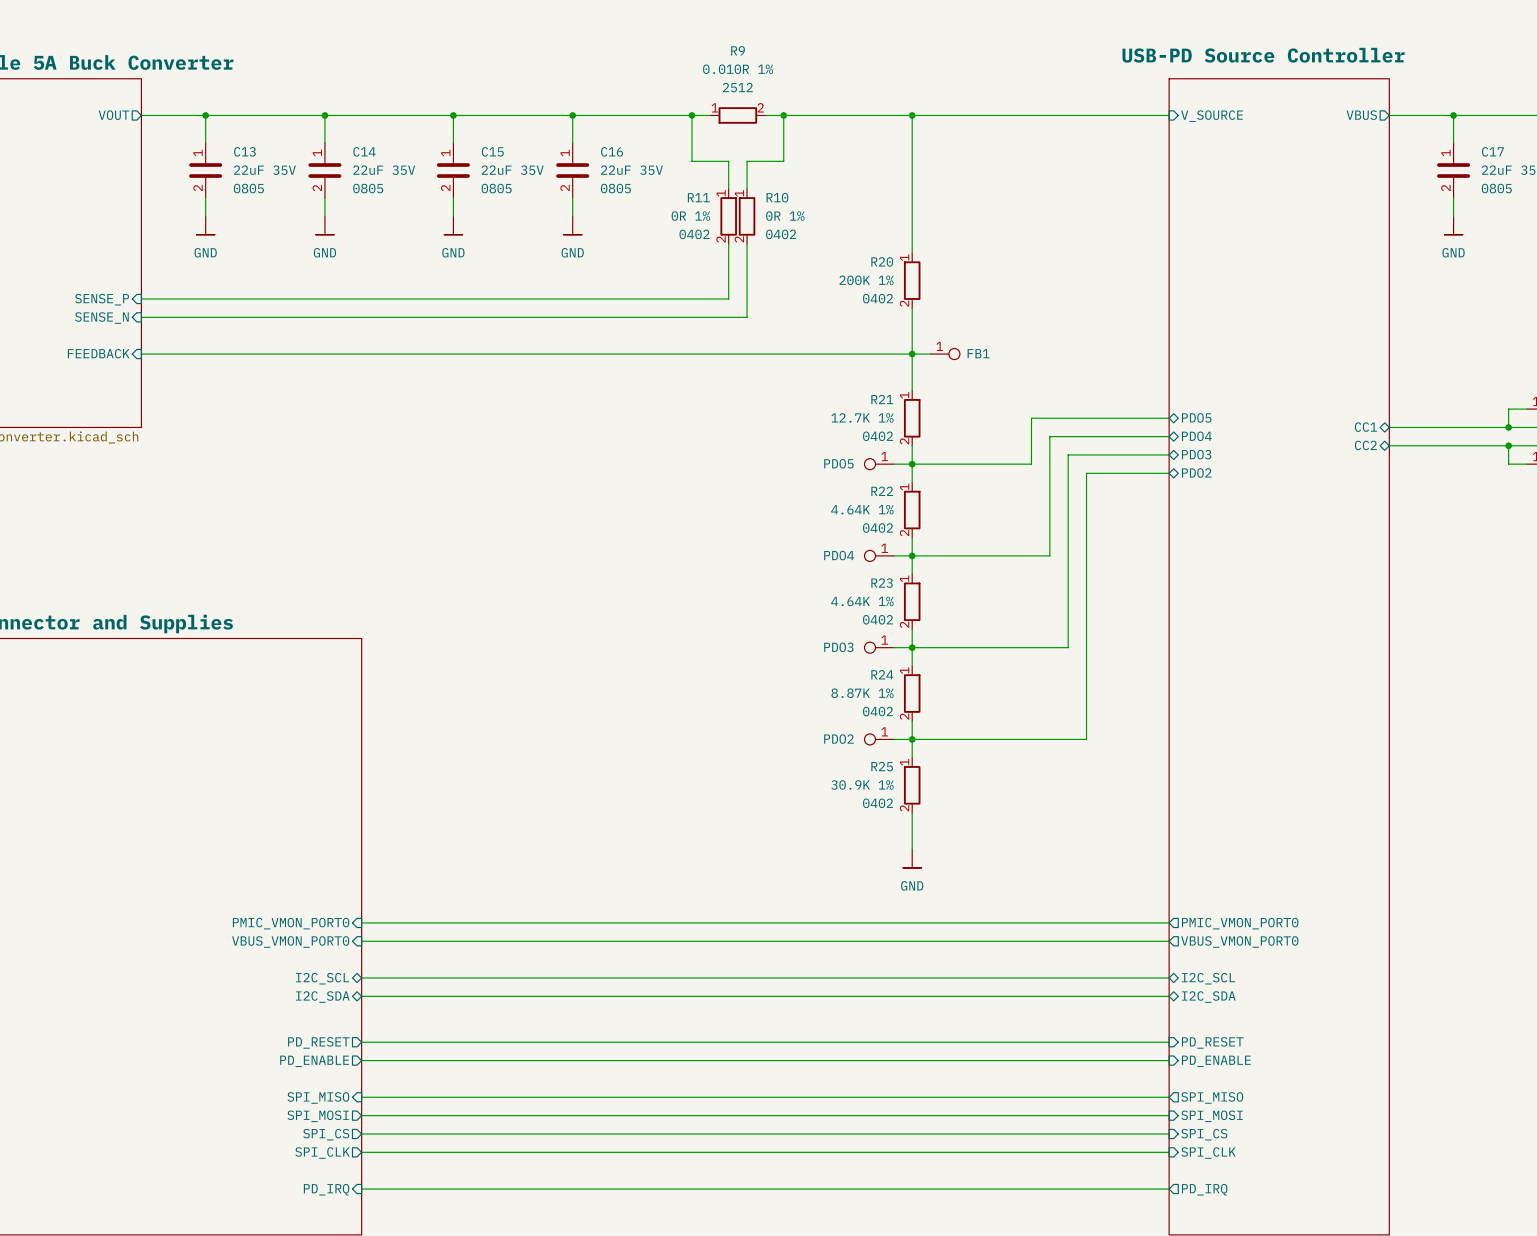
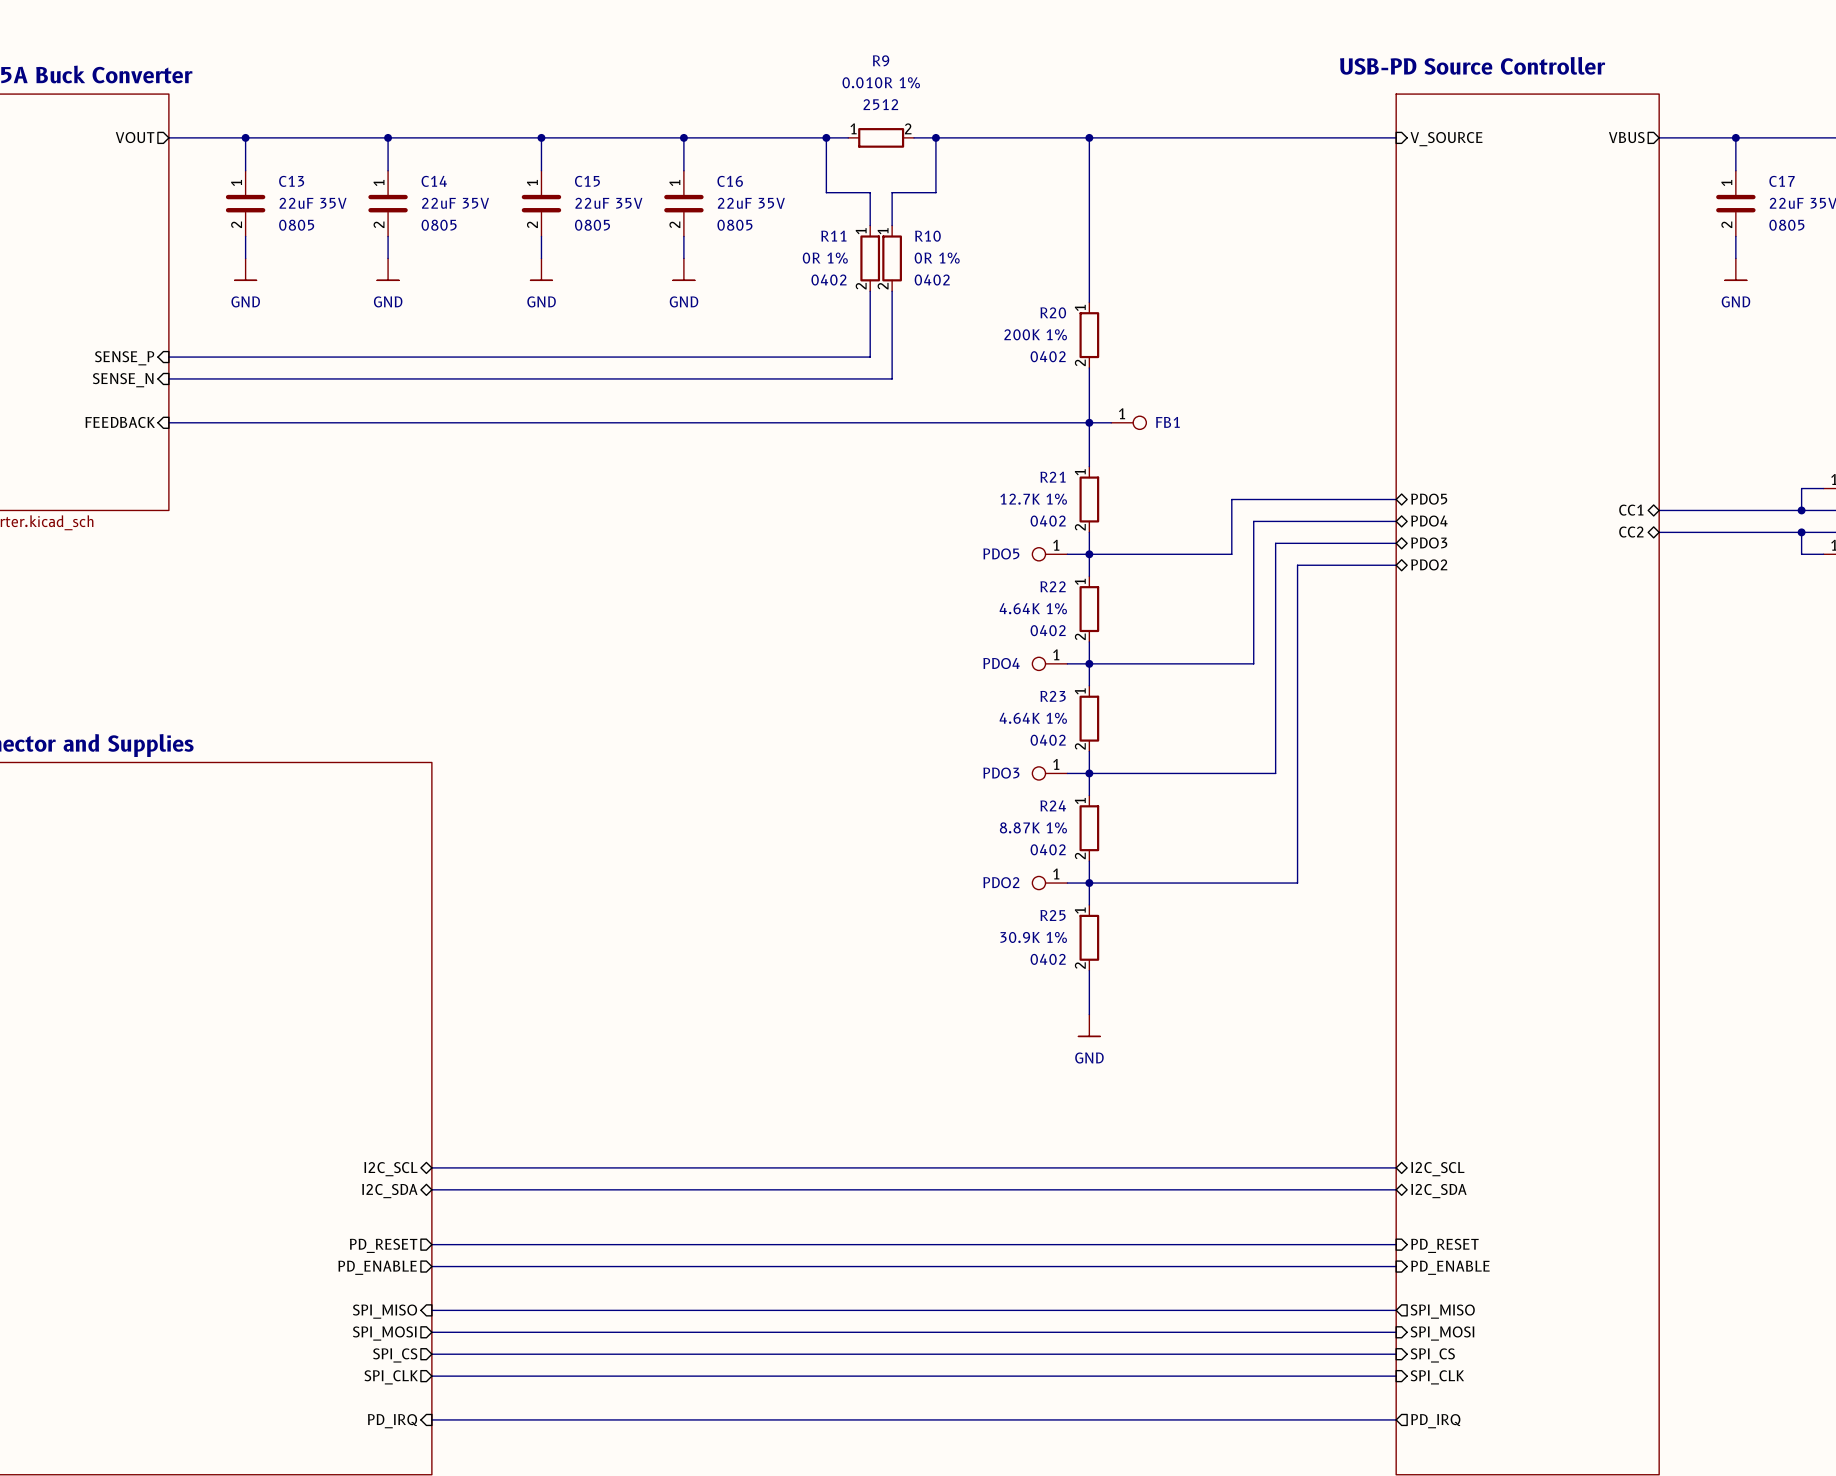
wire: (361, 922) (1169, 922) -> none
sheet pin: PMIC_VMON_PORT0 (291, 923) -> none
sheet pin: PMIC_VMON_PORT0 (1240, 923) -> none
sheet pin: VBUS_VMON_PORT0 (290, 941) -> none
wire: (361, 941) (1169, 941) -> none
sheet pin: VBUS_VMON_PORT0 (1239, 941) -> none

